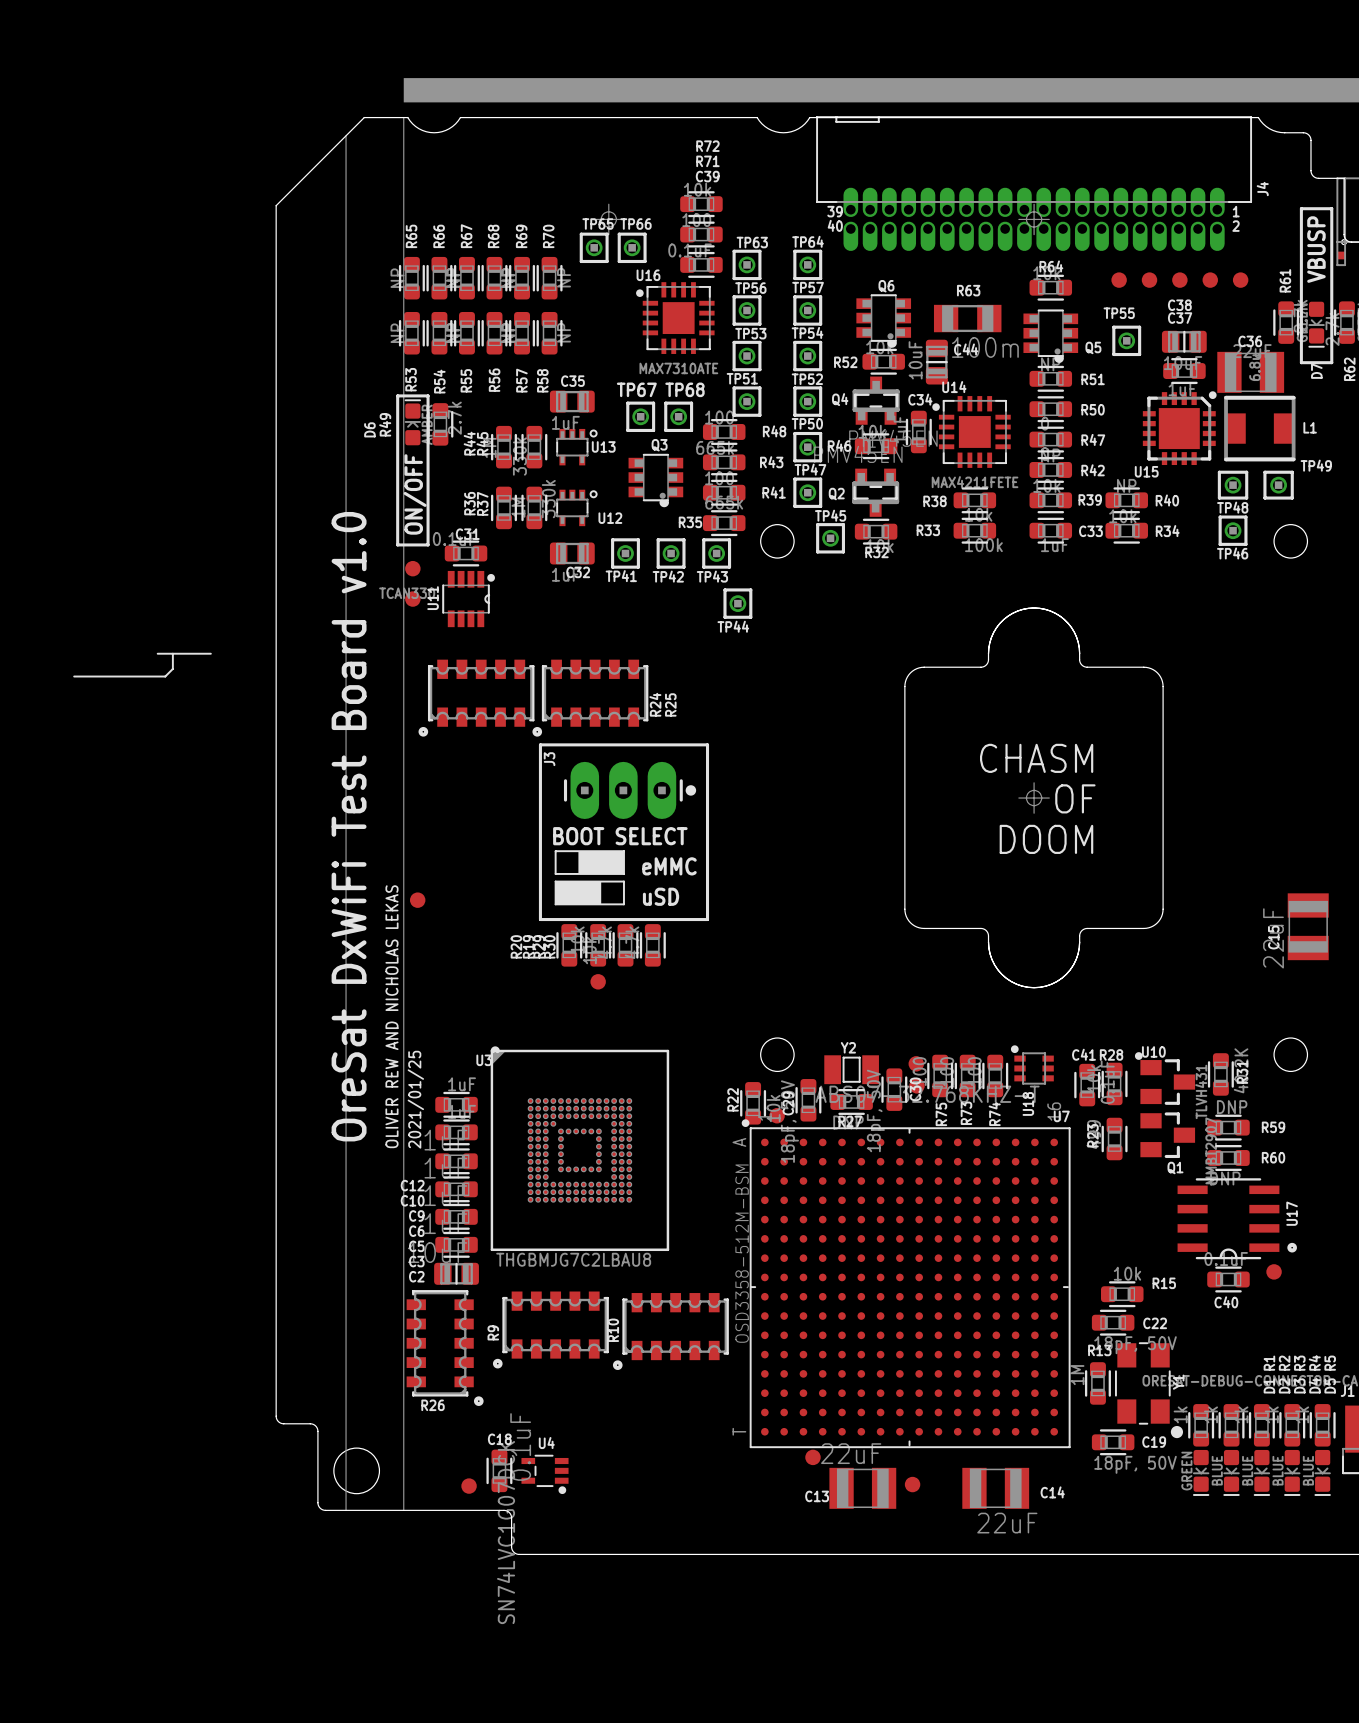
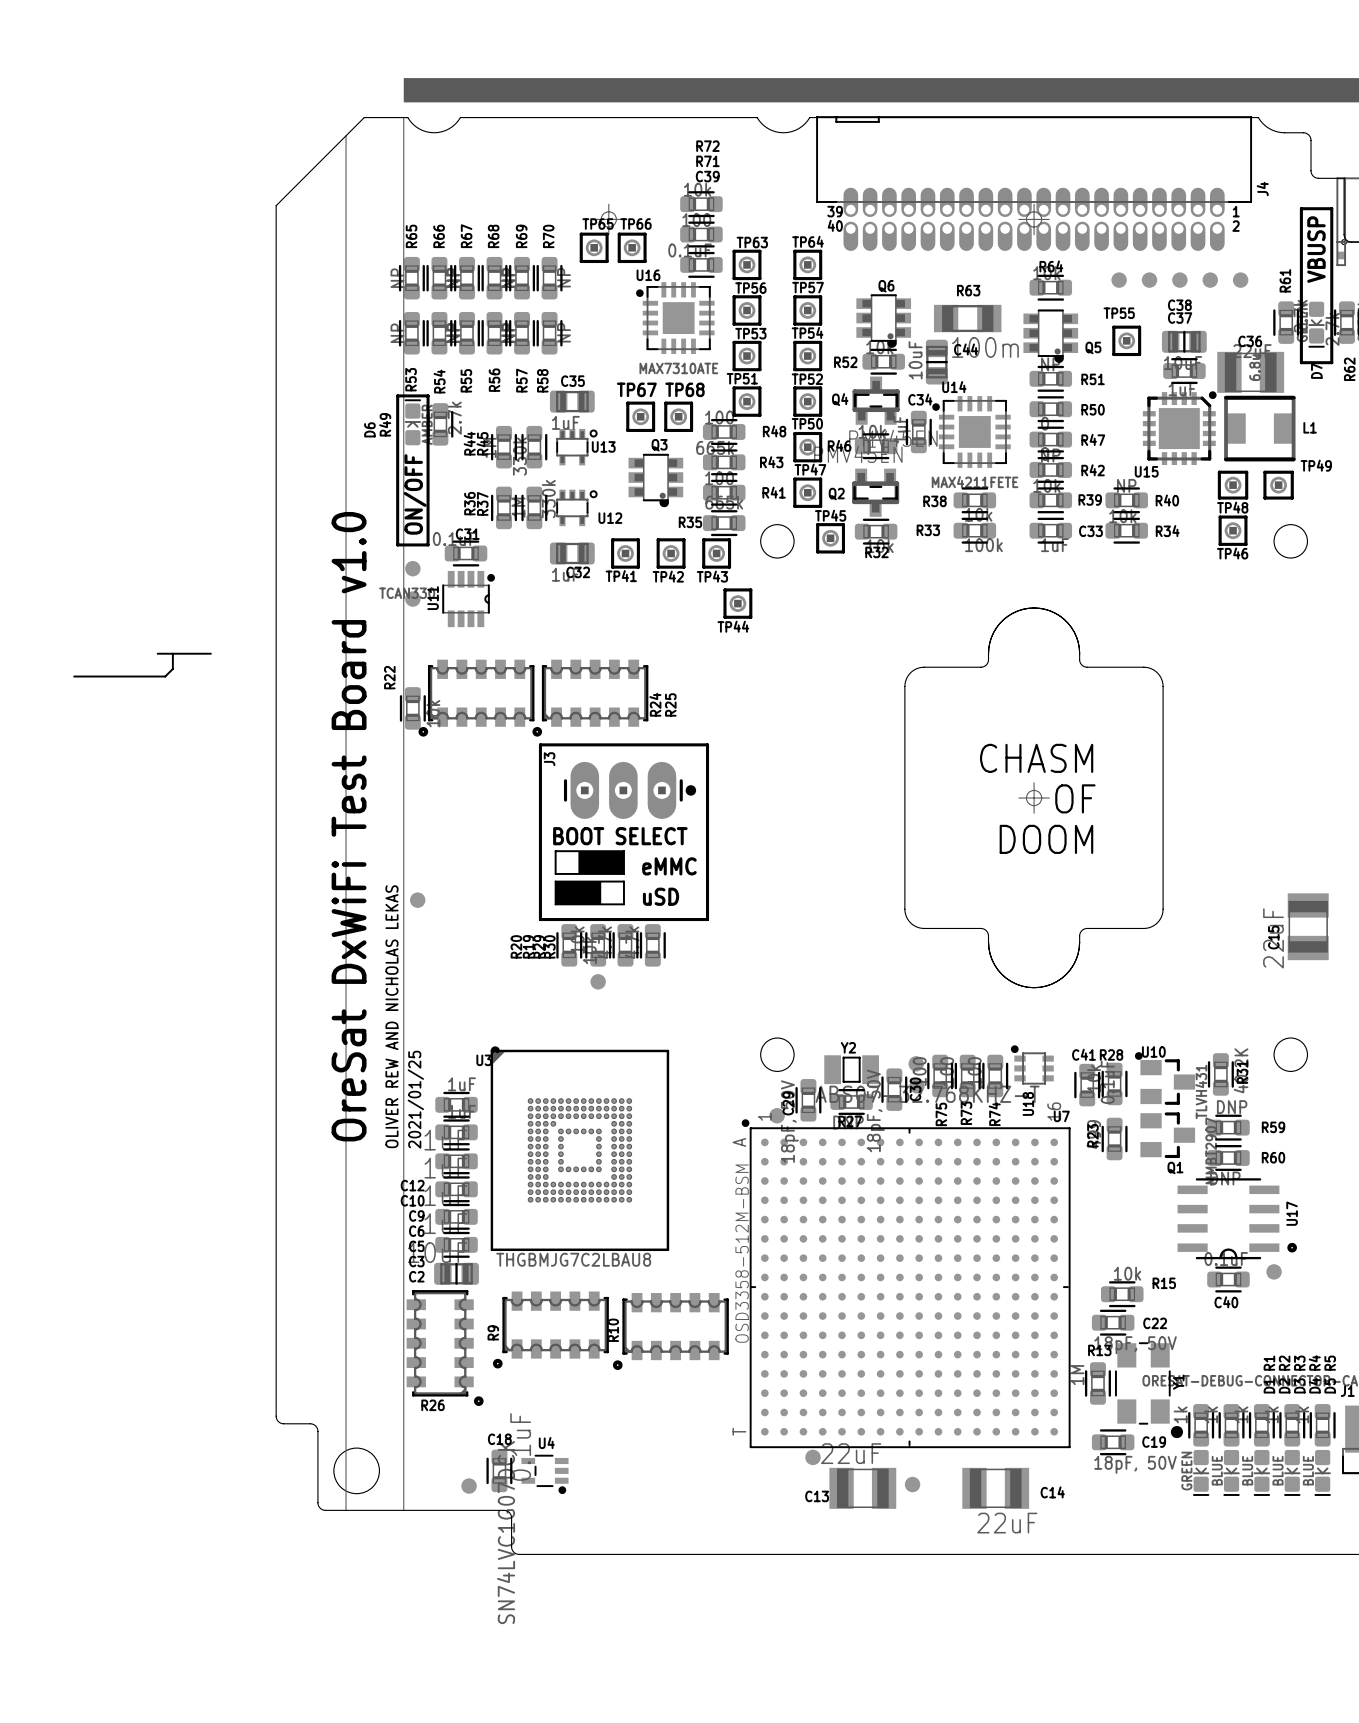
R22 name position: R22 (733, 1099) -> R22 (389, 677)
R22 position: (753, 1103) -> (412, 708)

